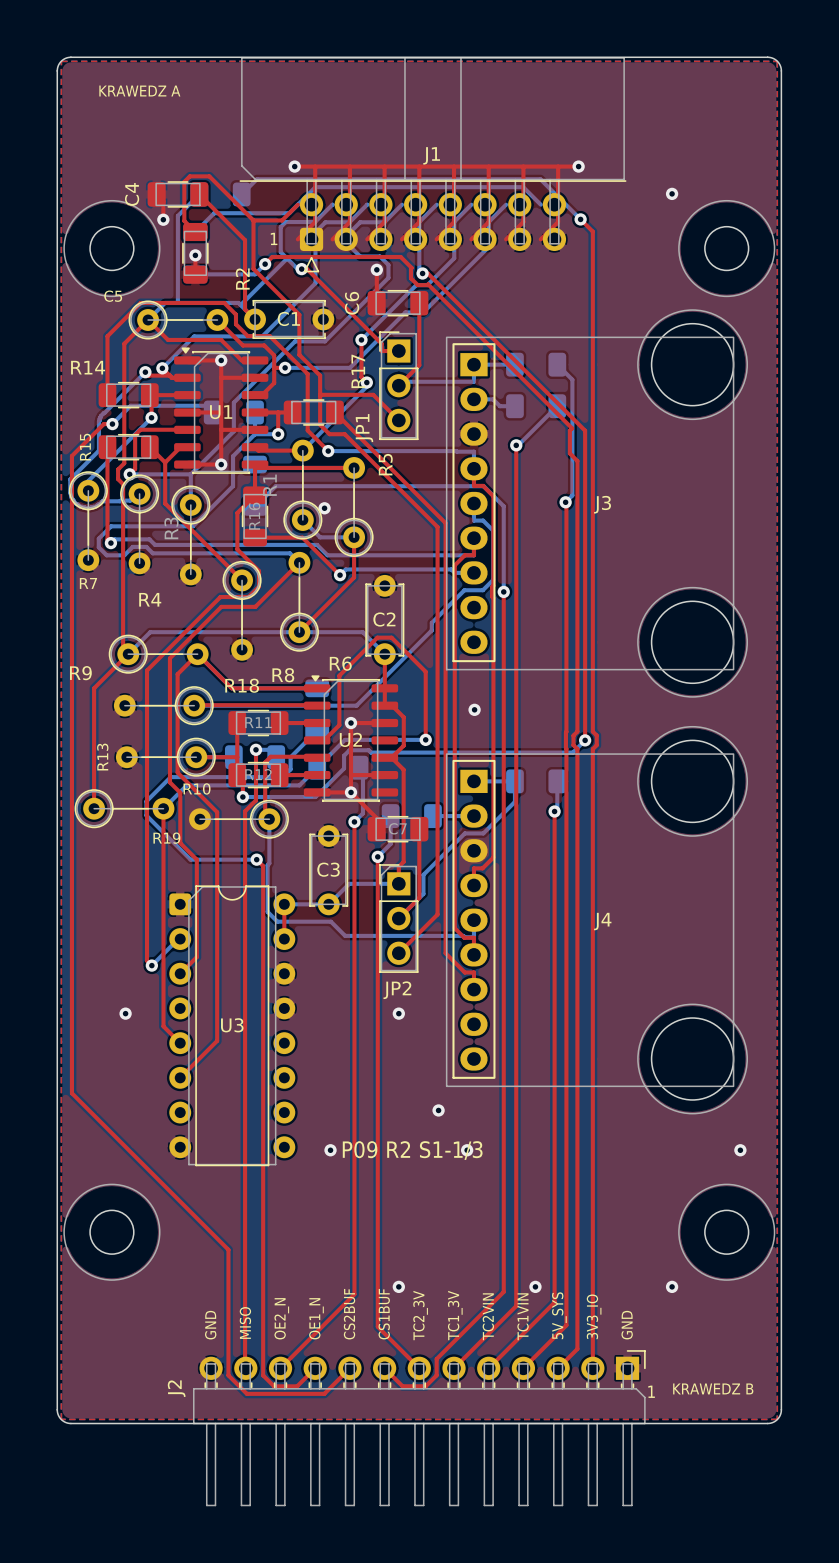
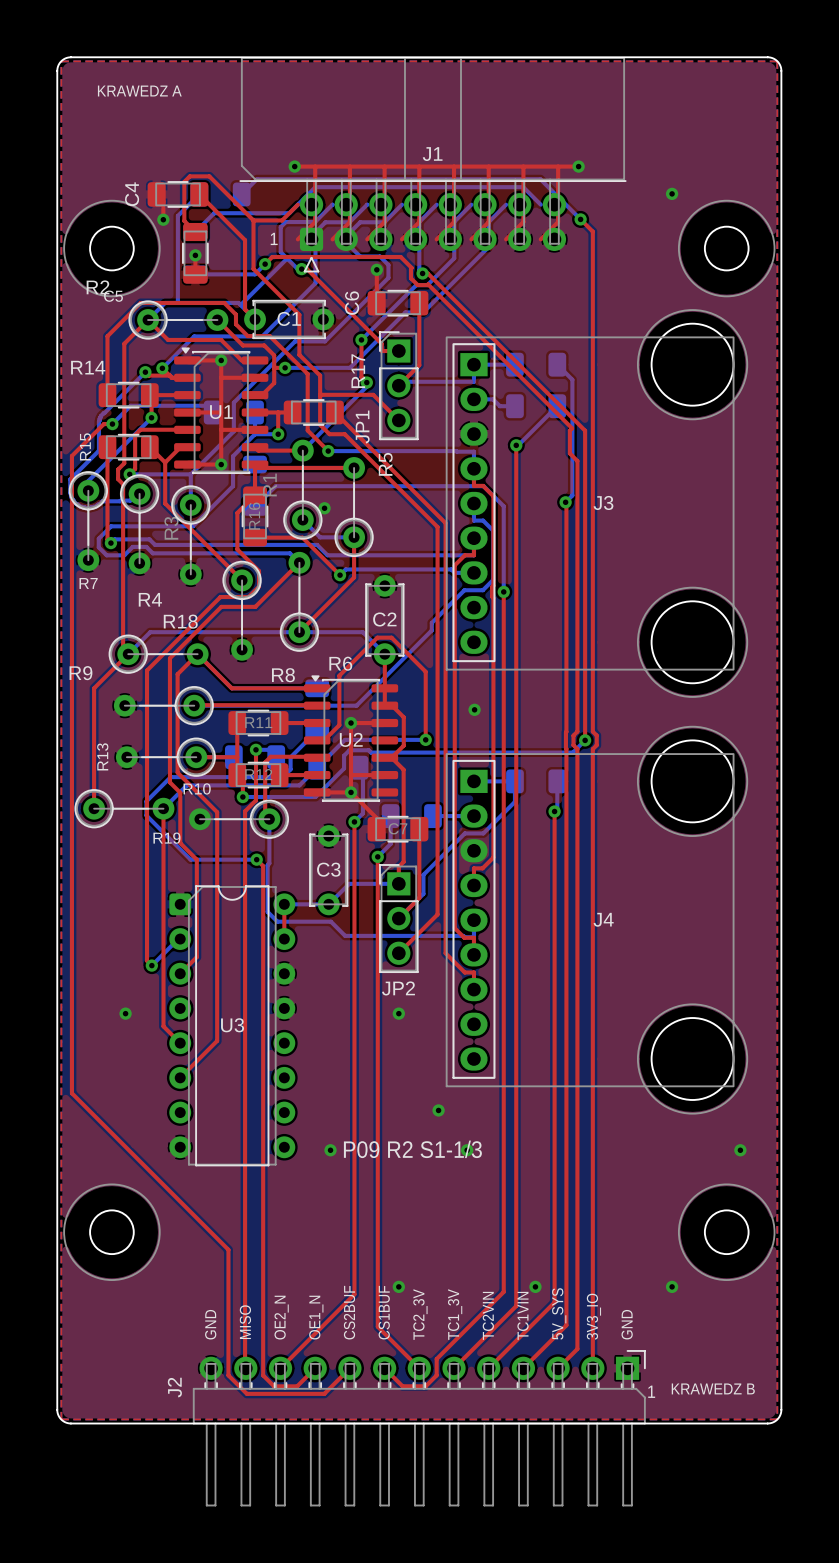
R2 name rotation: 0° (242, 279) -> 90° clockwise (98, 287)
R2 name position: R2 (242, 279) -> R2 (98, 287)
R18 name position: R18 (242, 685) -> R18 (180, 621)

